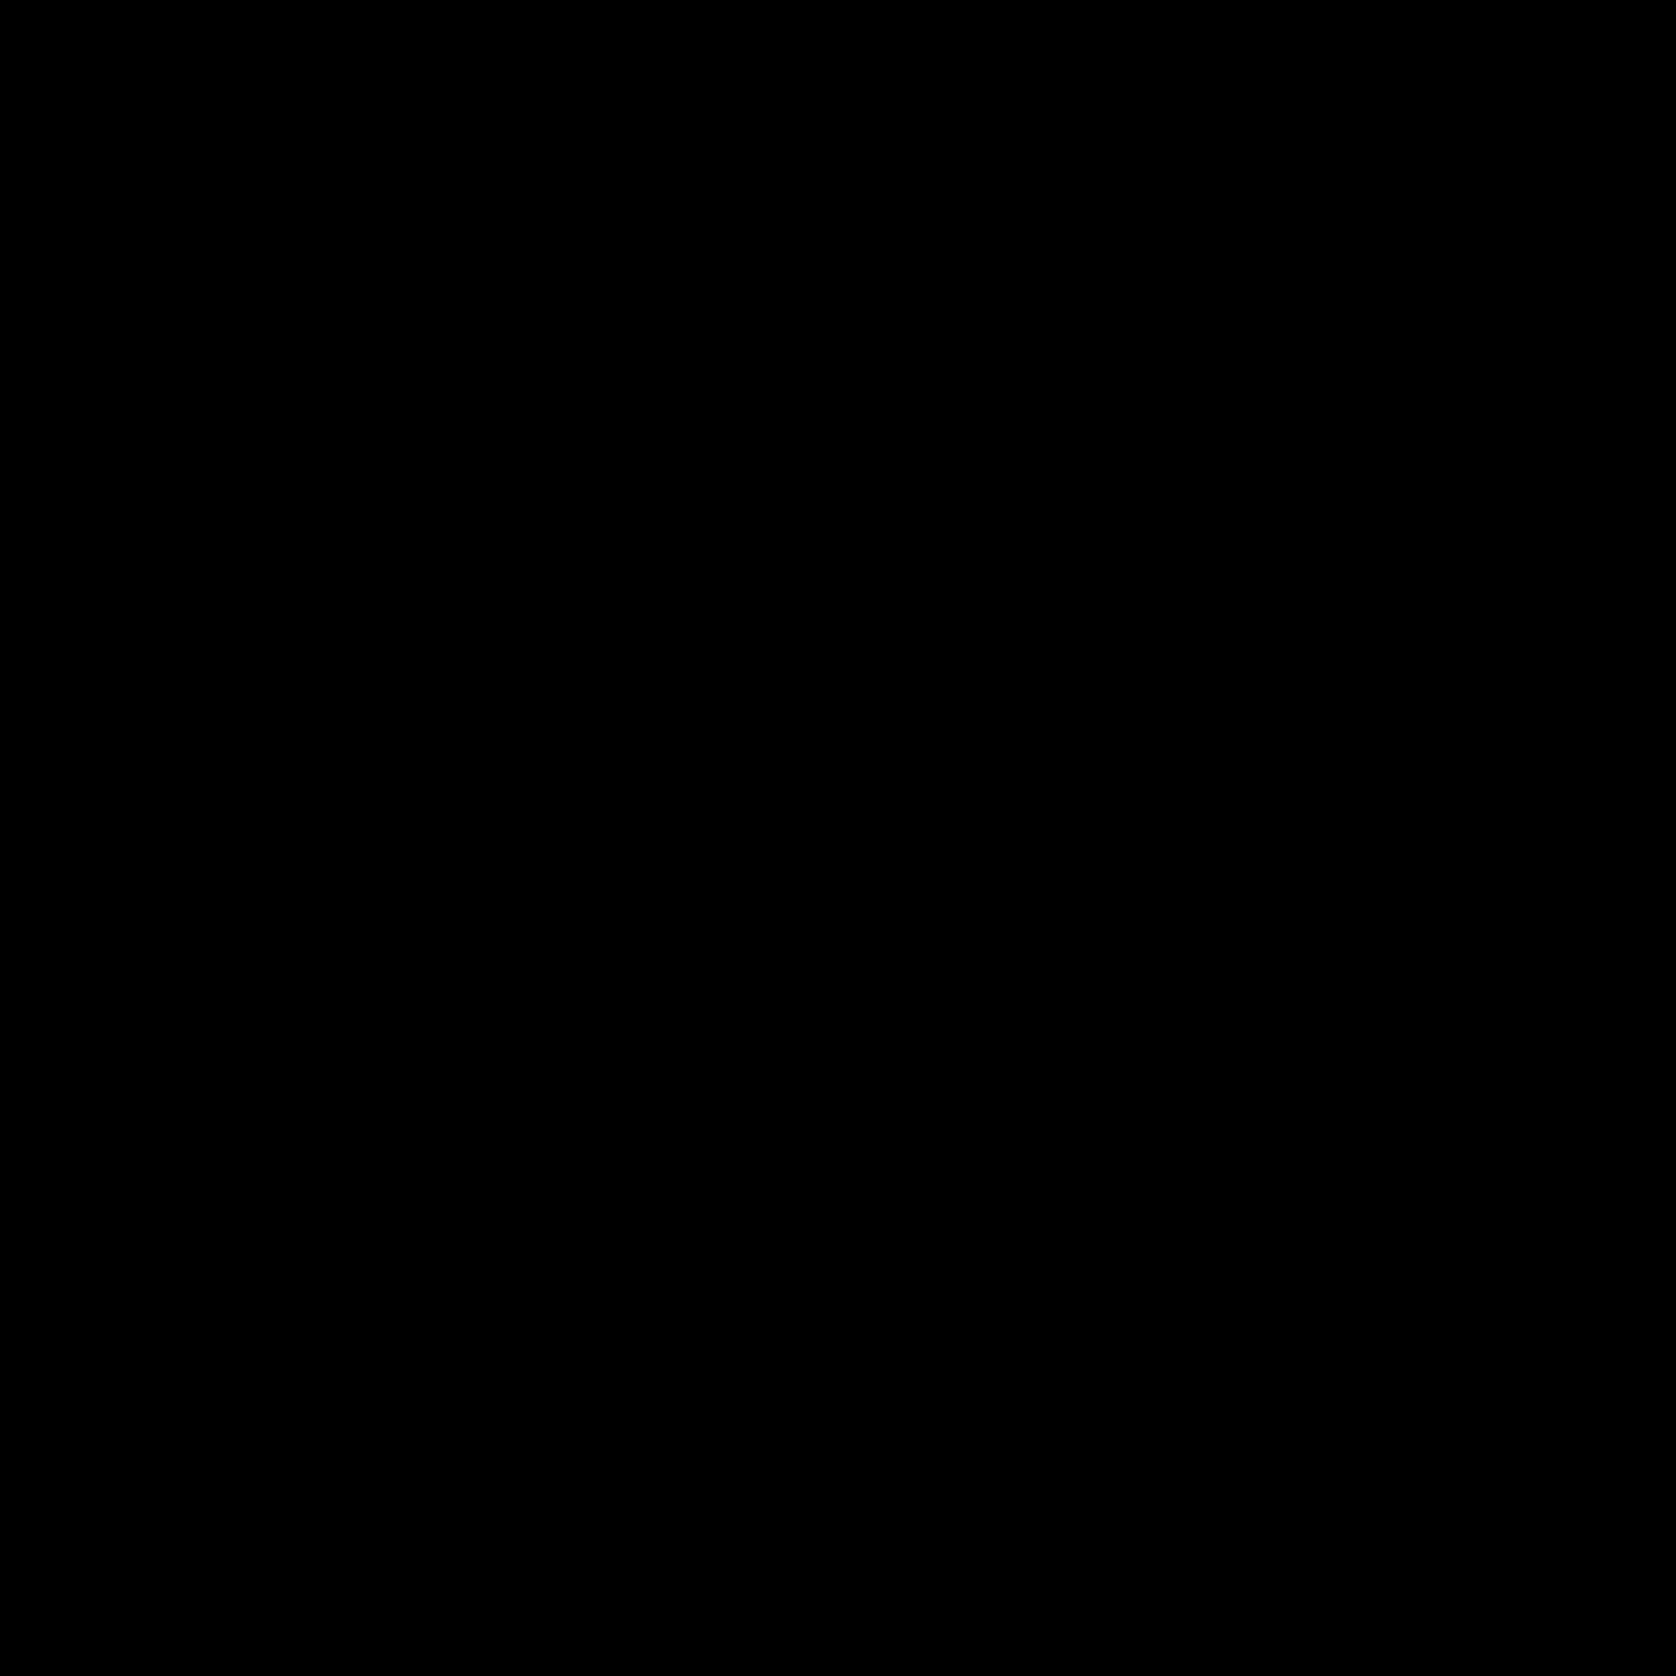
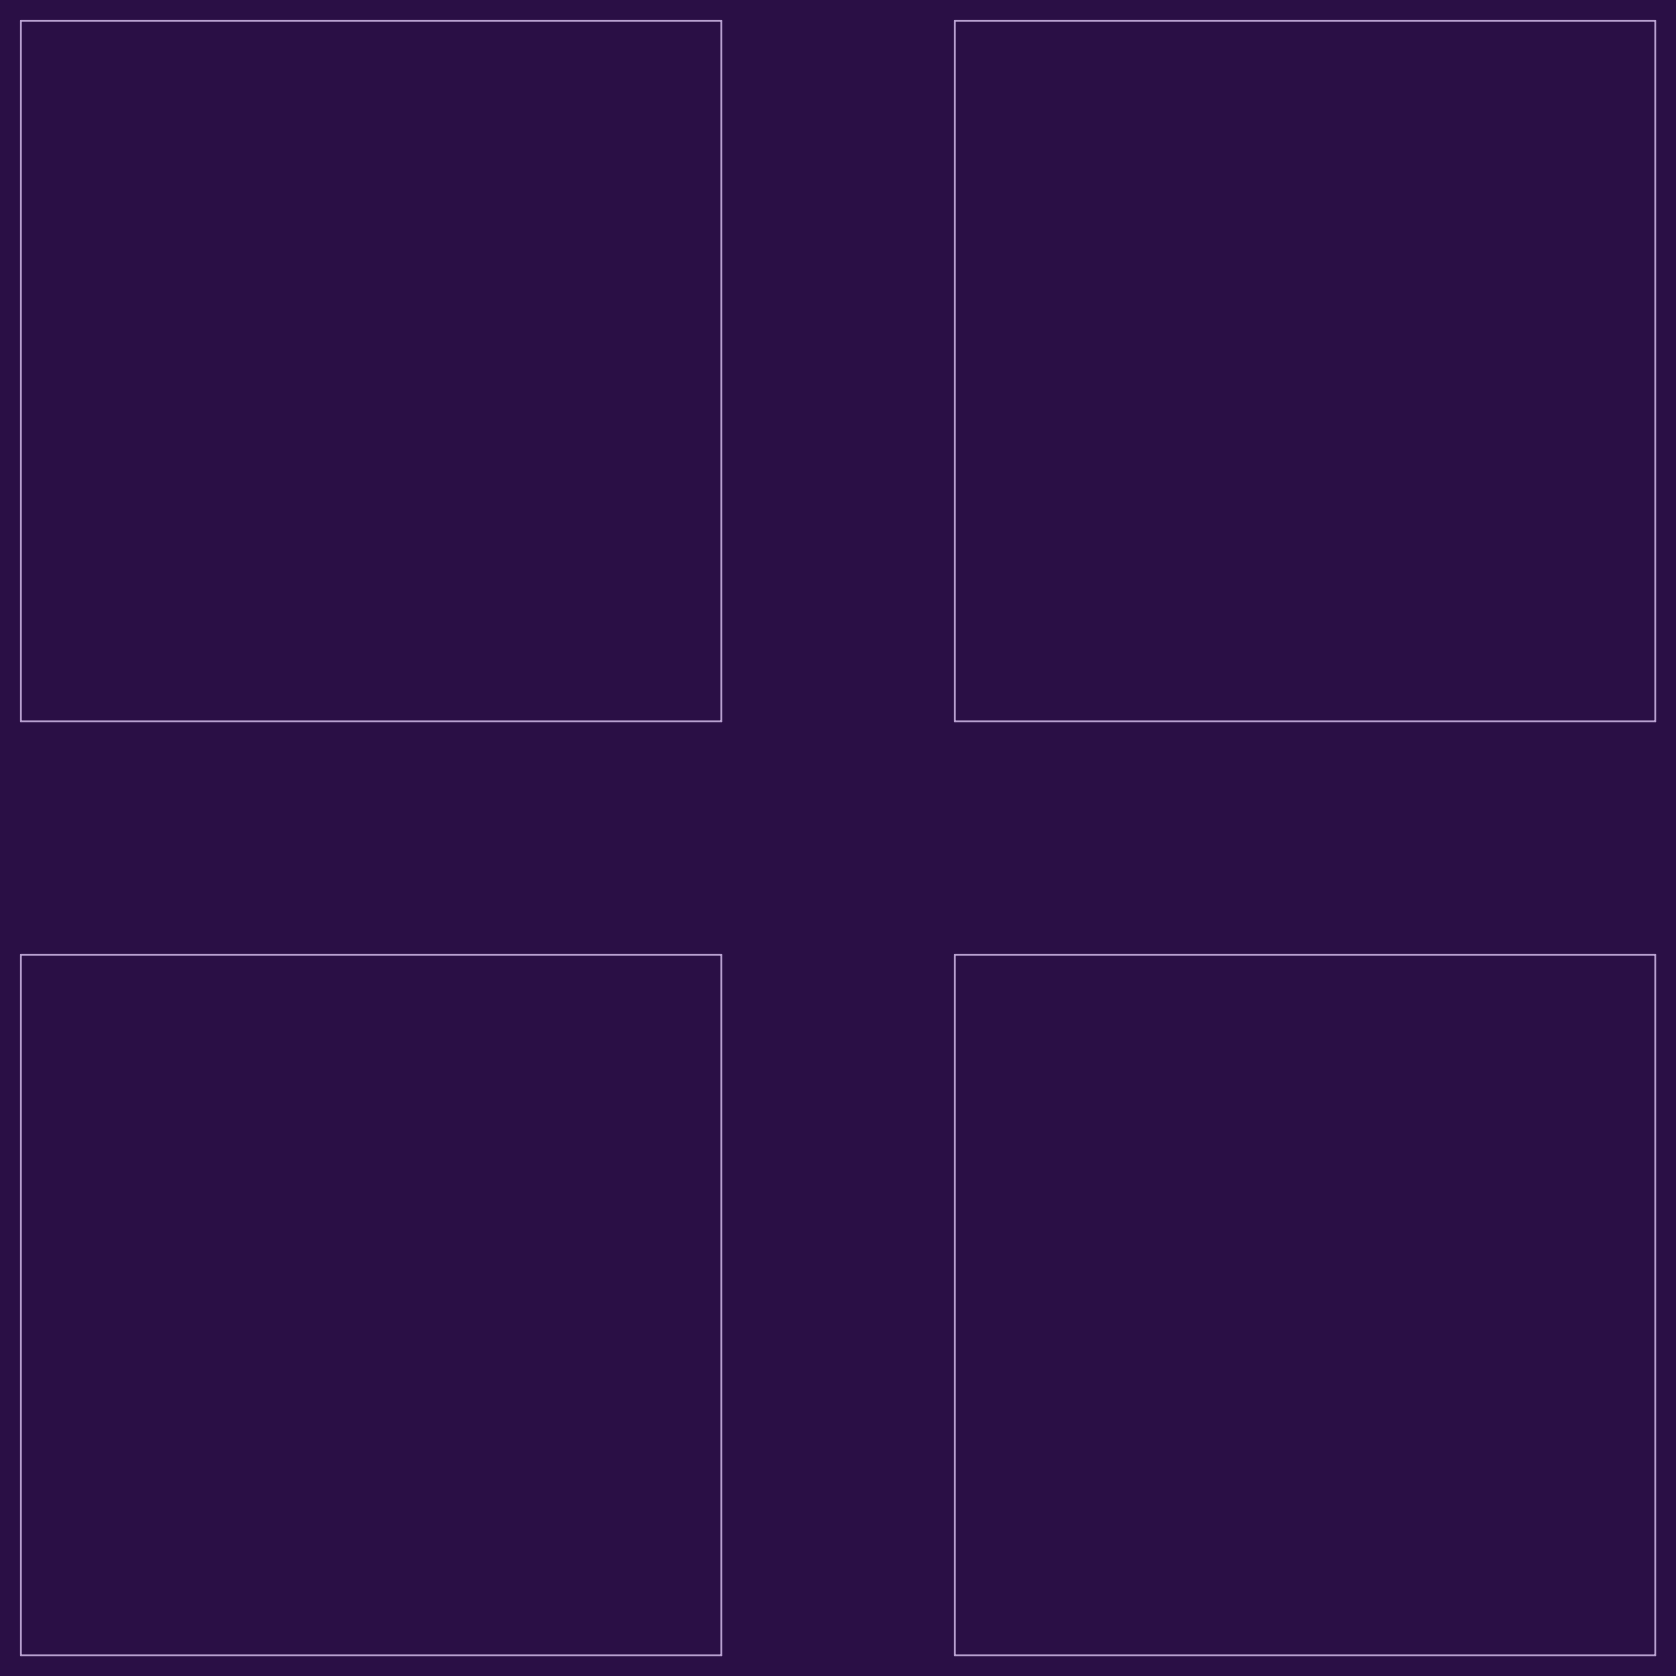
line: none -> (20, 20) (721, 20) (721, 721) (20, 721) (20, 20)
line: none -> (954, 20) (954, 721) (1655, 721) (1655, 20) (954, 20)
line: none -> (20, 954) (721, 954) (721, 1655) (20, 1655) (20, 954)
line: none -> (954, 954) (1655, 954) (1655, 1655) (954, 1655) (954, 954)

